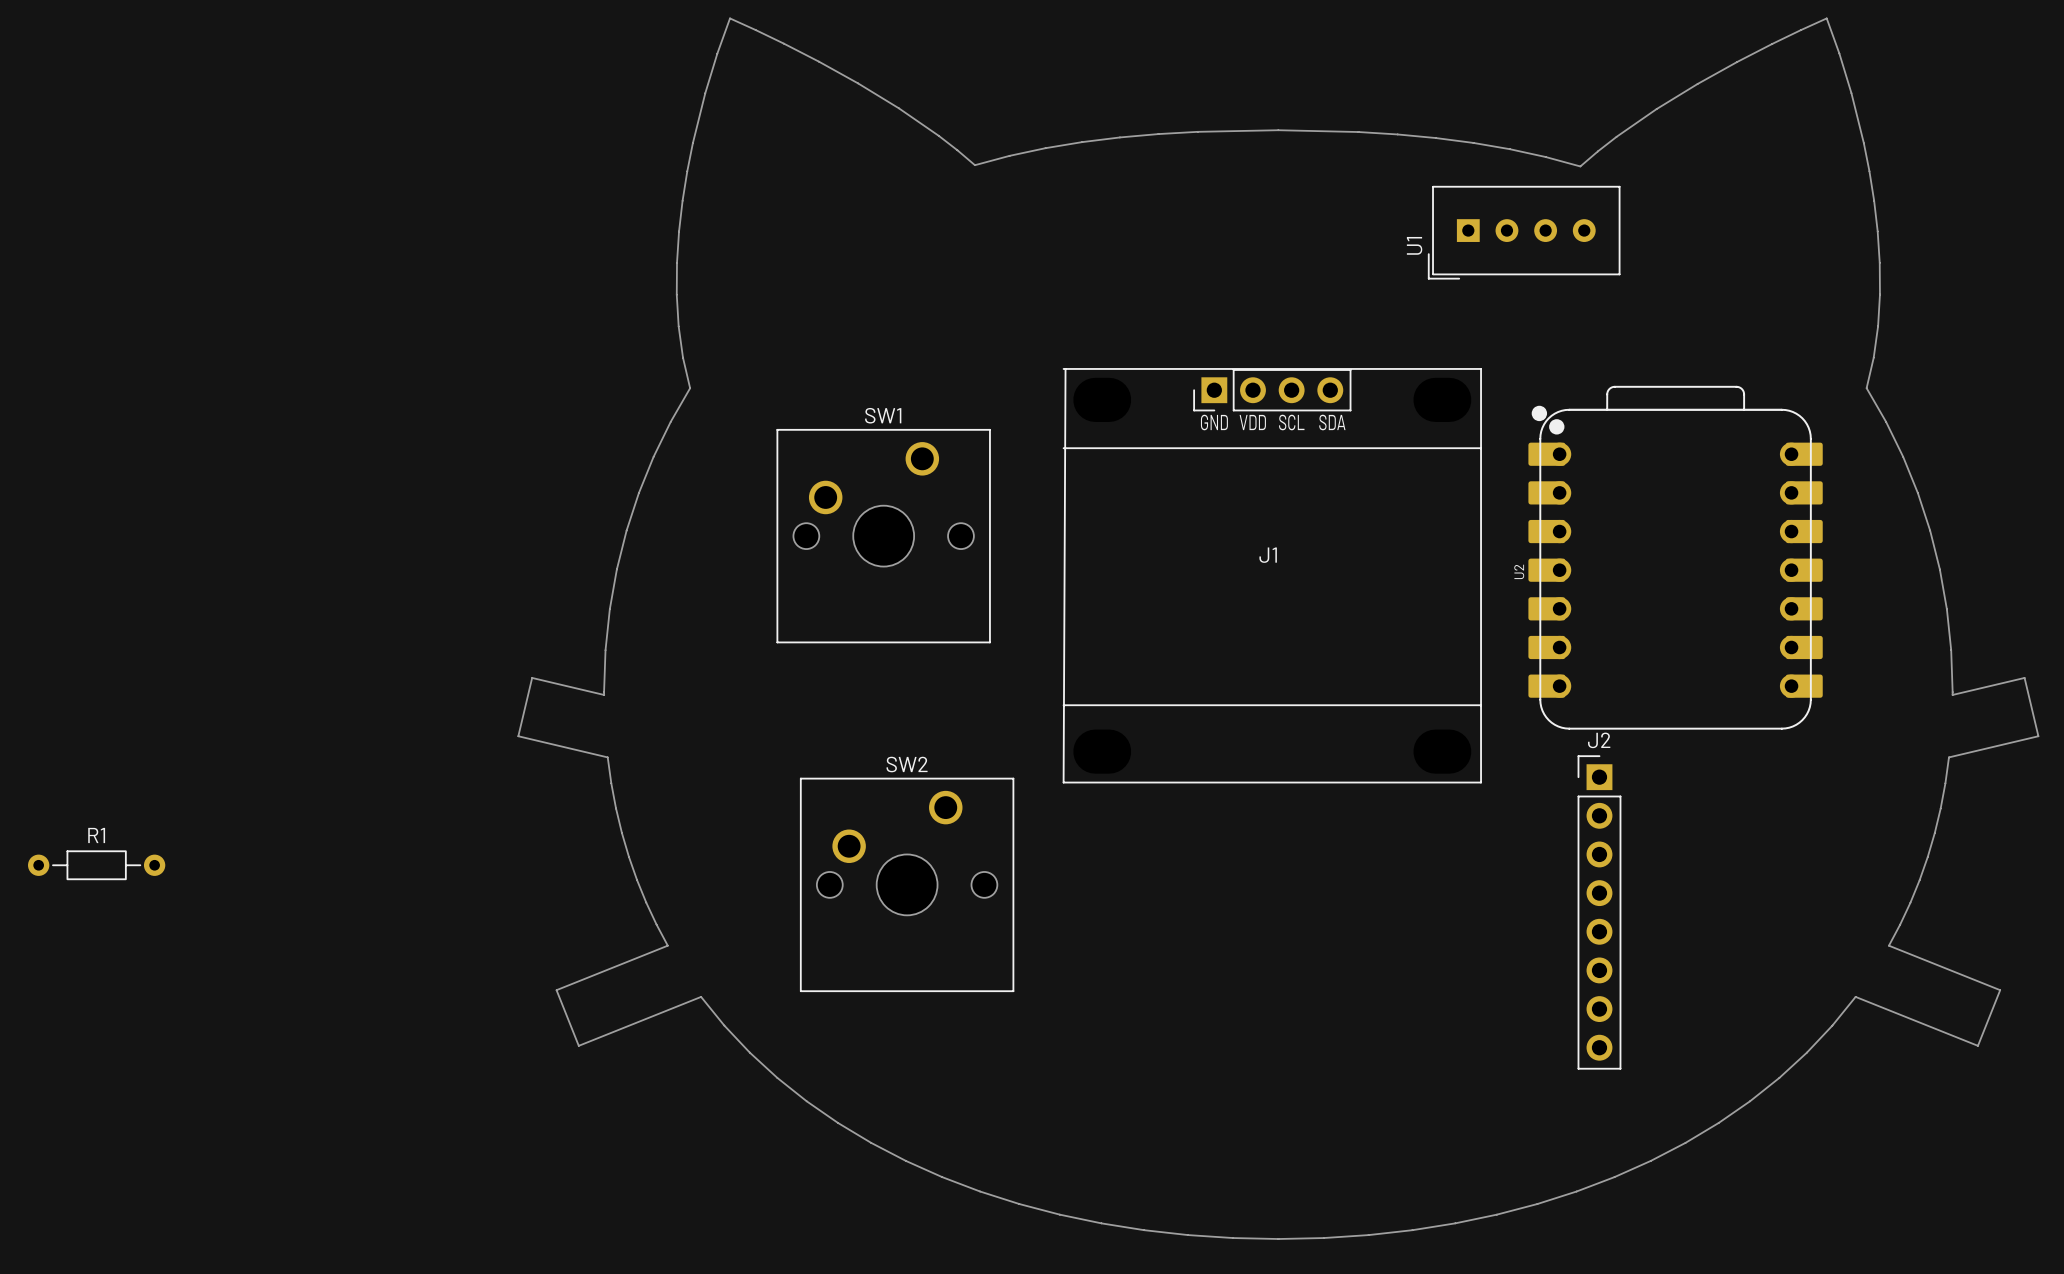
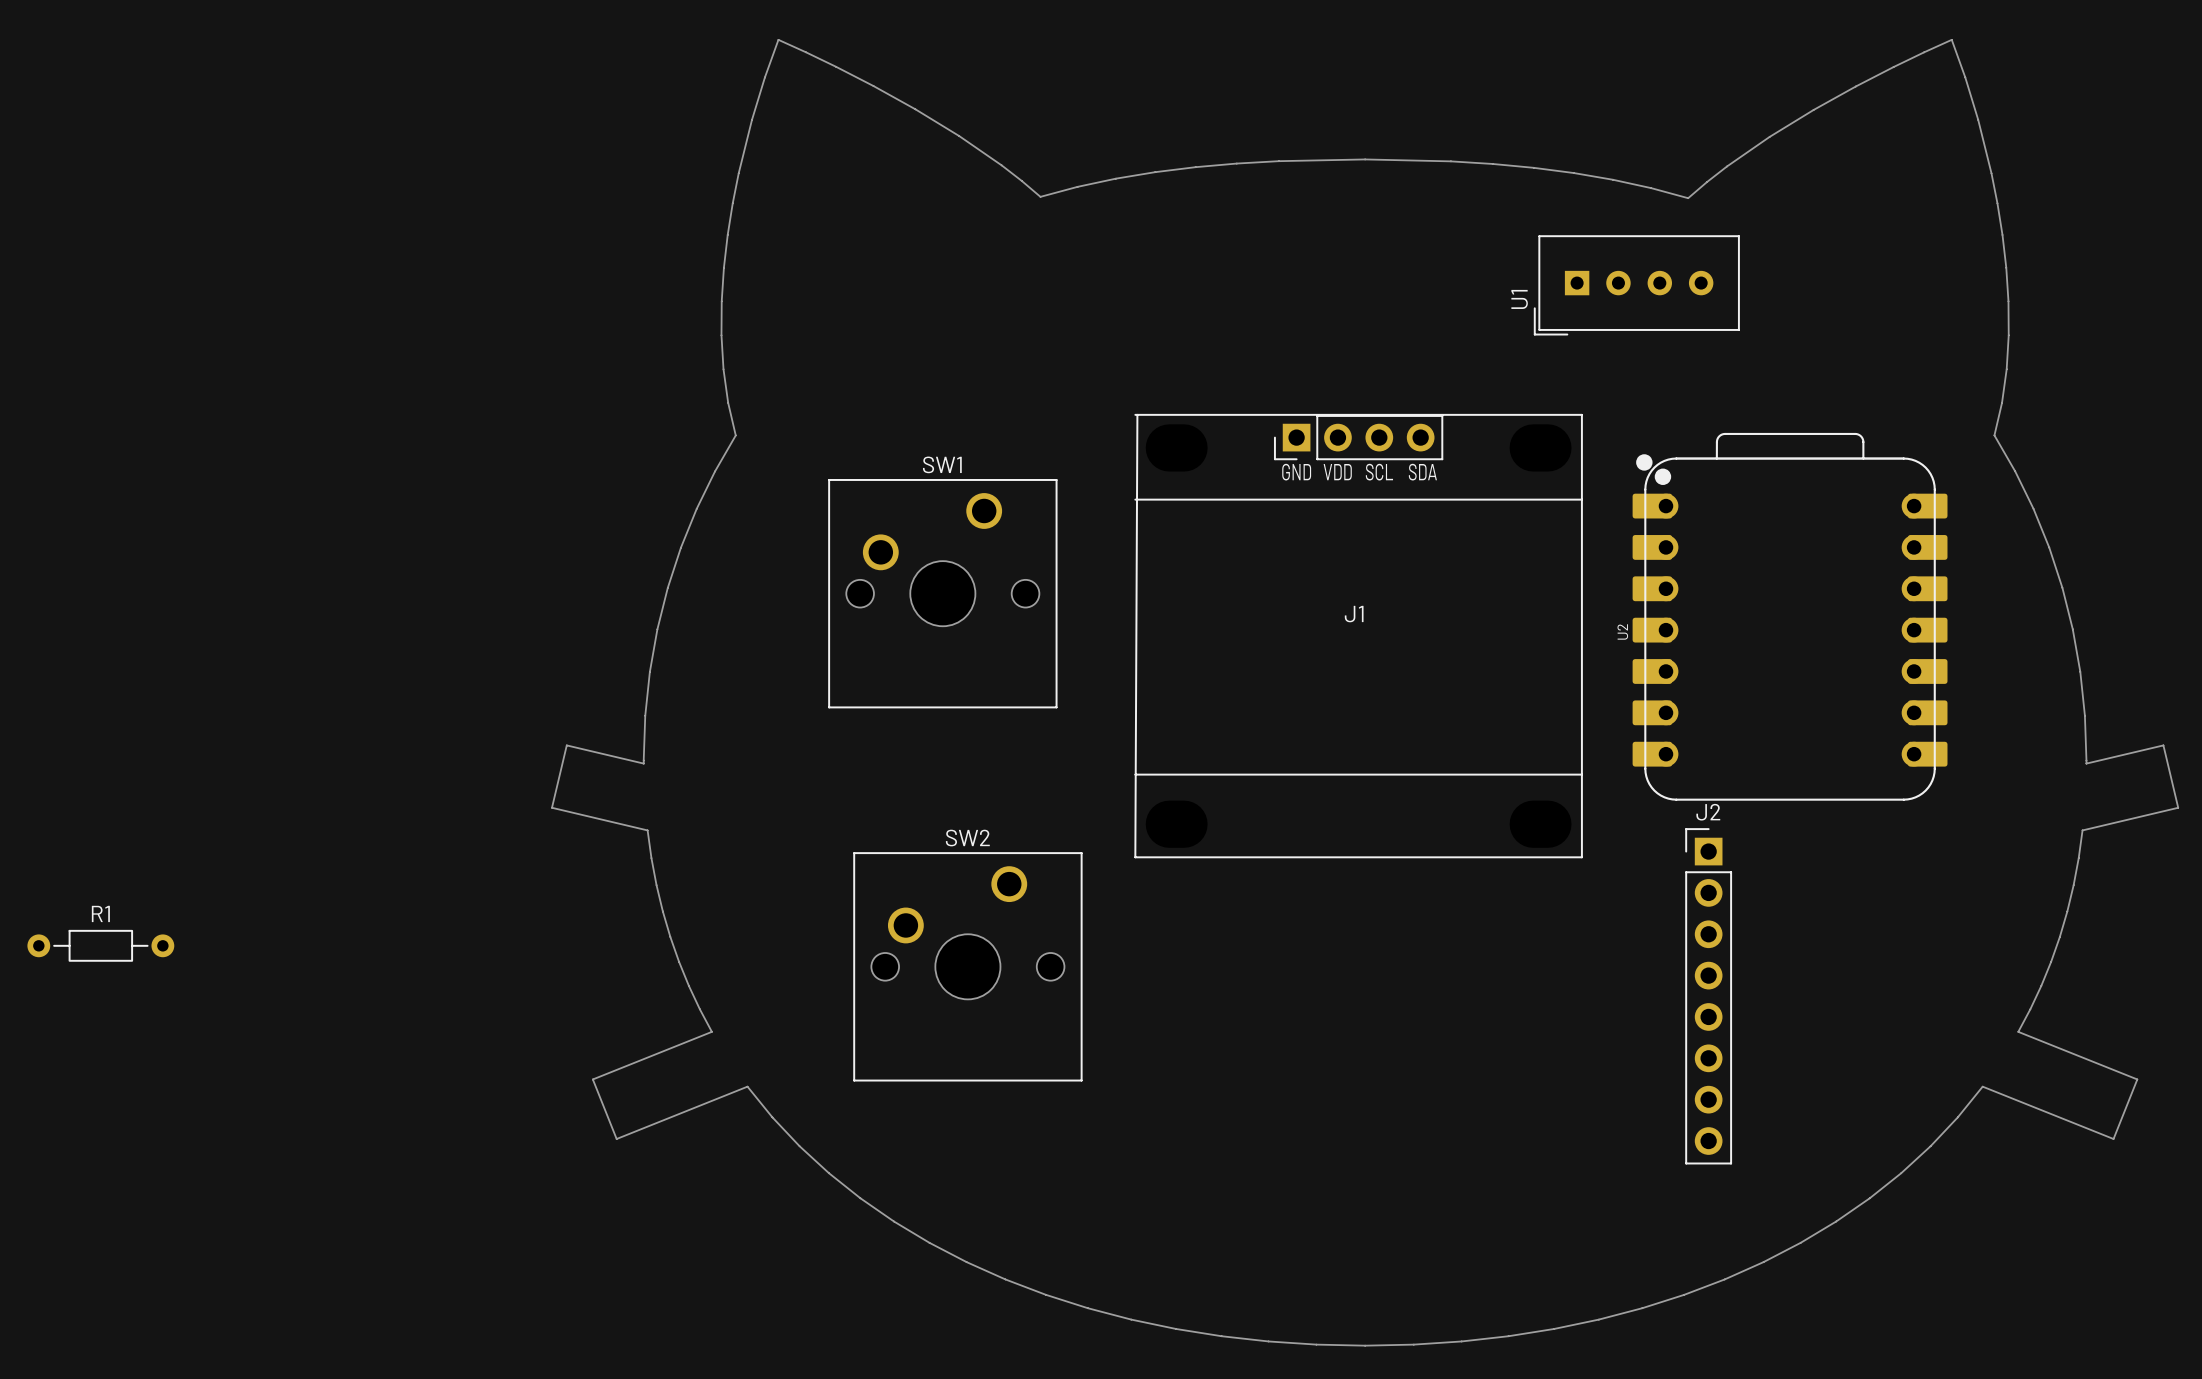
U1 position: (1524, 232) -> (1636, 285)

